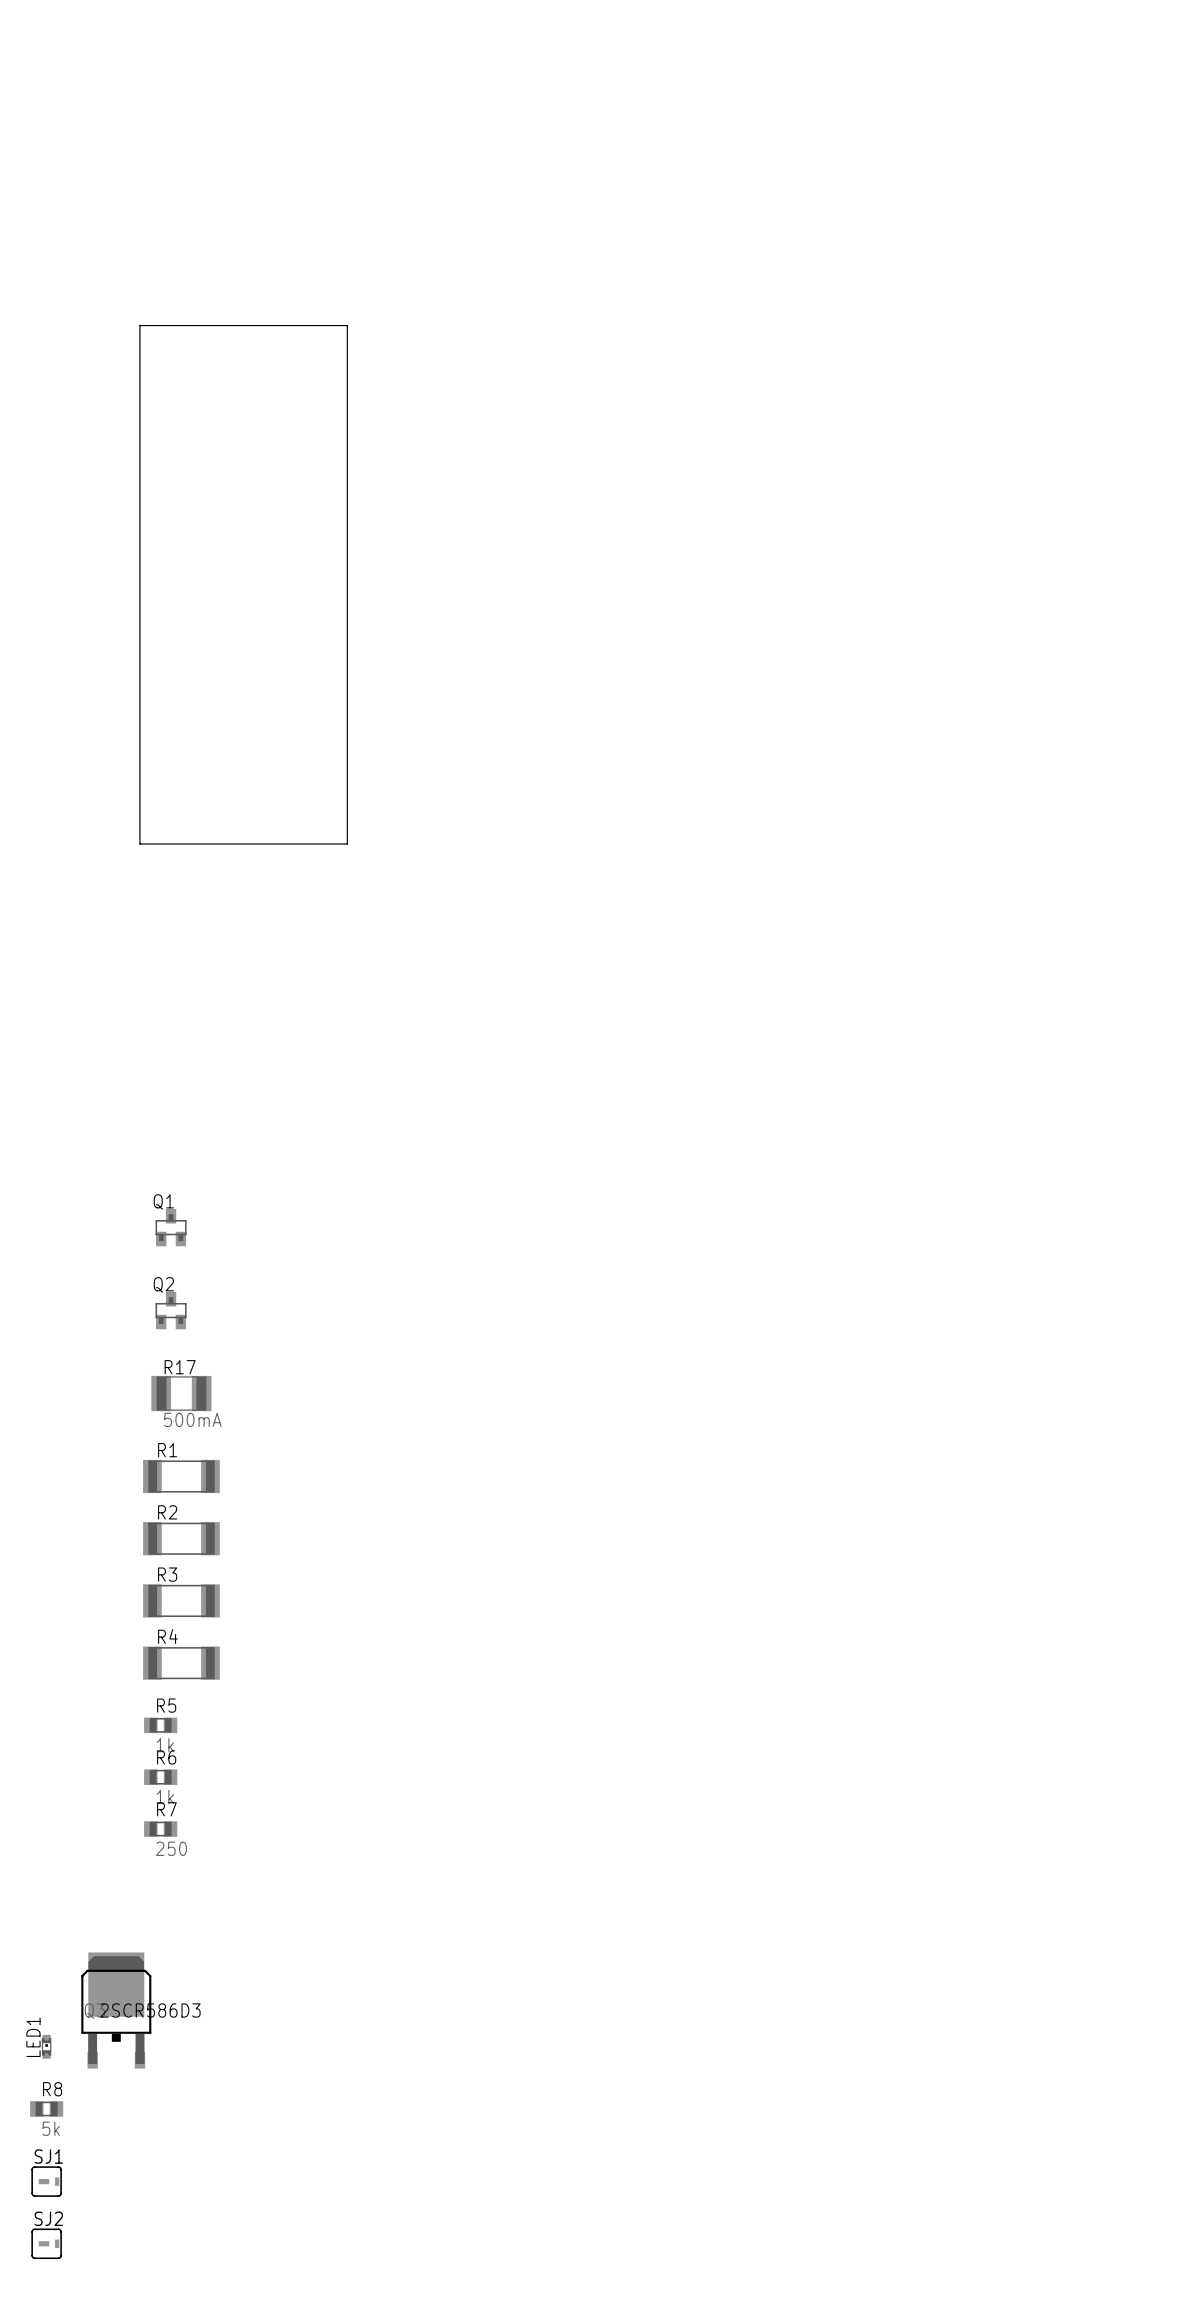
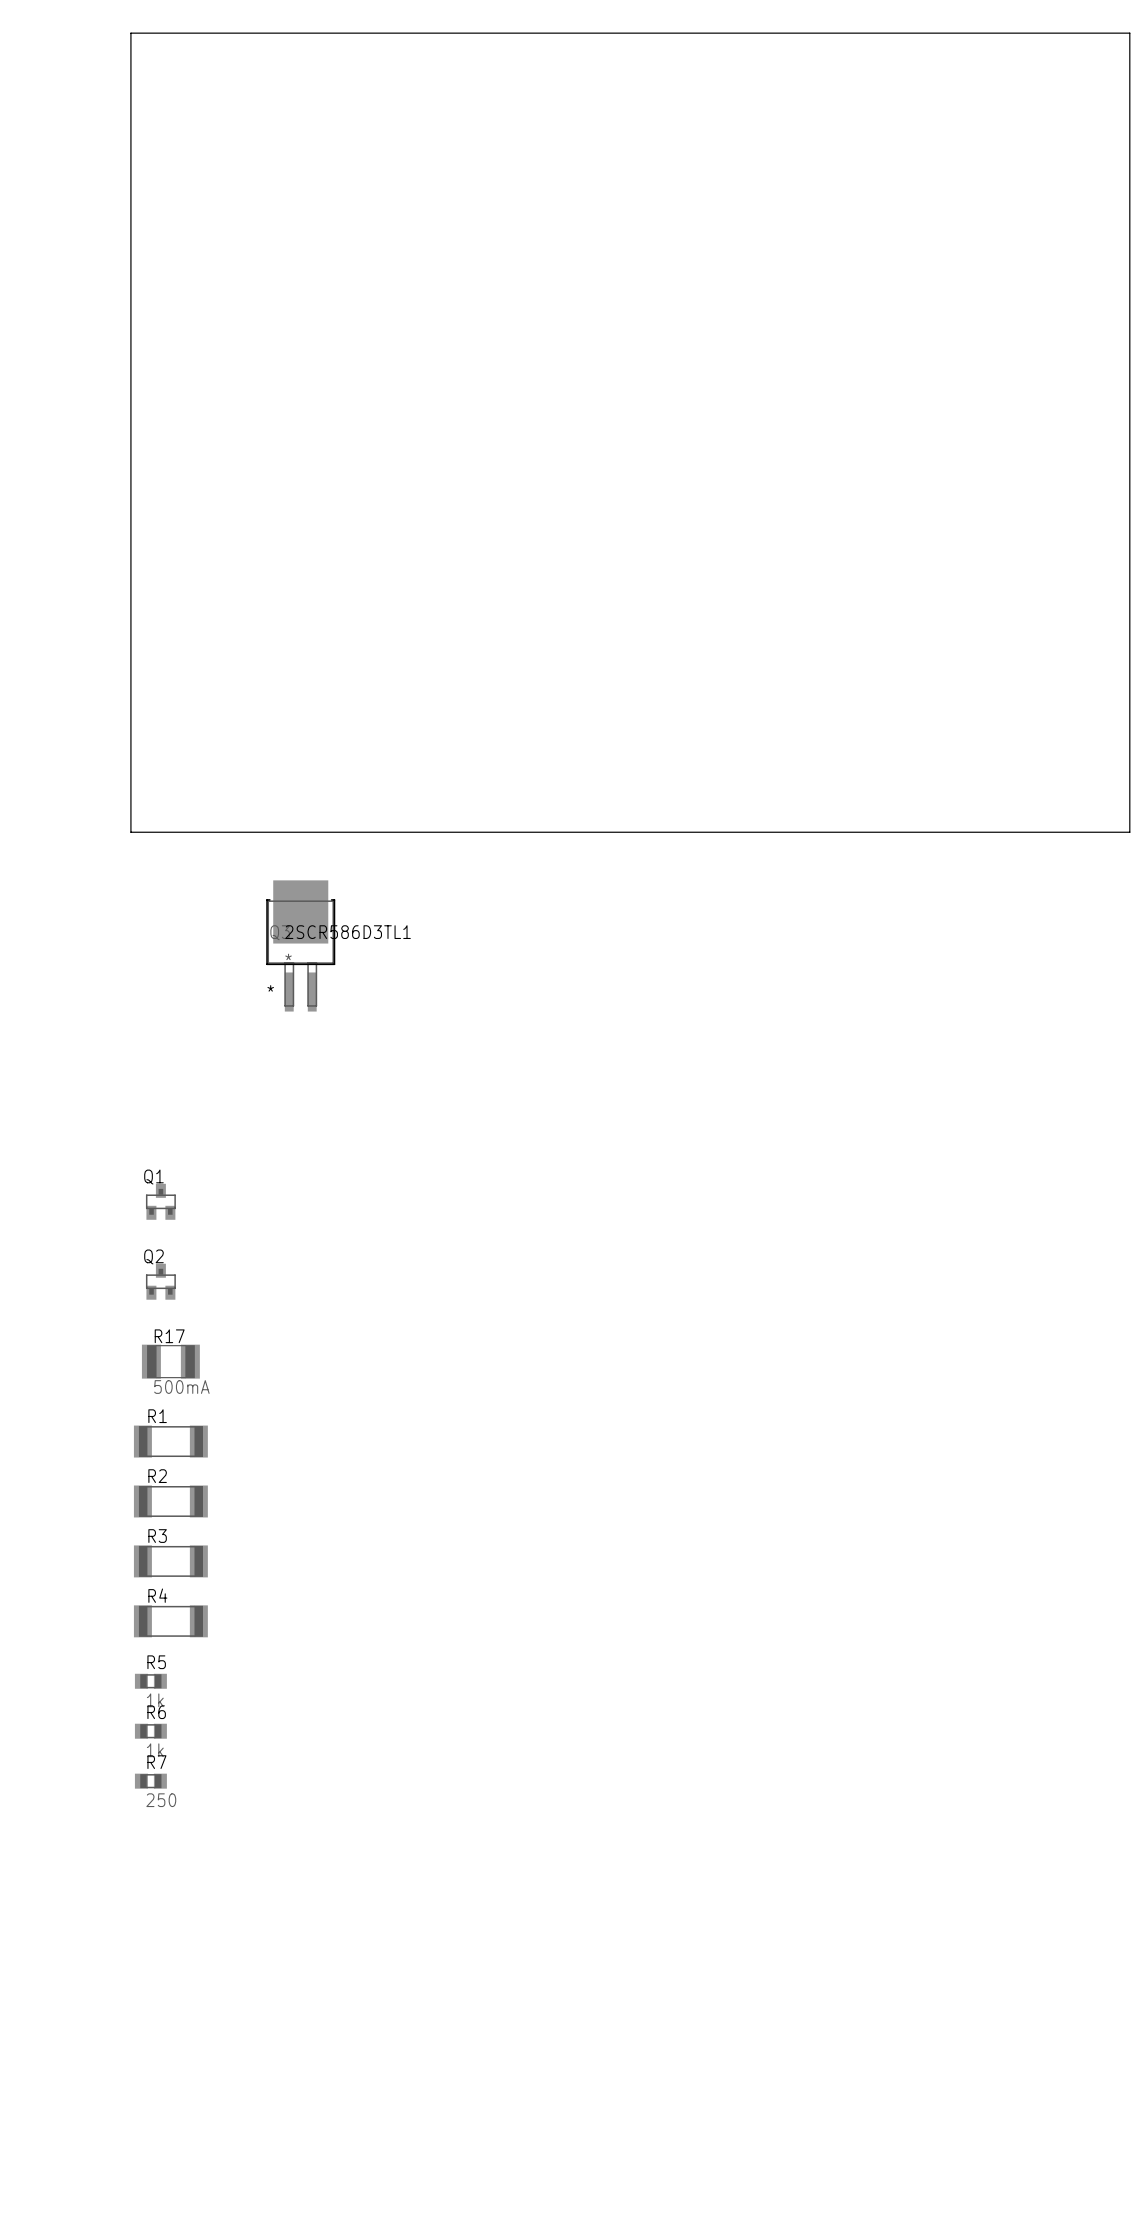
board edge: (139, 325) (347, 325) (347, 844) -> (130, 332) (130, 33) (1129, 33) (1129, 832) (330, 832)
part footprint: [81, 1952, 152, 2069] -> [266, 880, 336, 1012]
part value: 2SCR586D3 (150, 2010) -> 2SCR586D3TL1 (348, 932)
LED1: (46, 2046) -> none
R8: 5k (46, 2108) -> none
SJ1: (46, 2181) -> none
SJ2: (46, 2243) -> none

